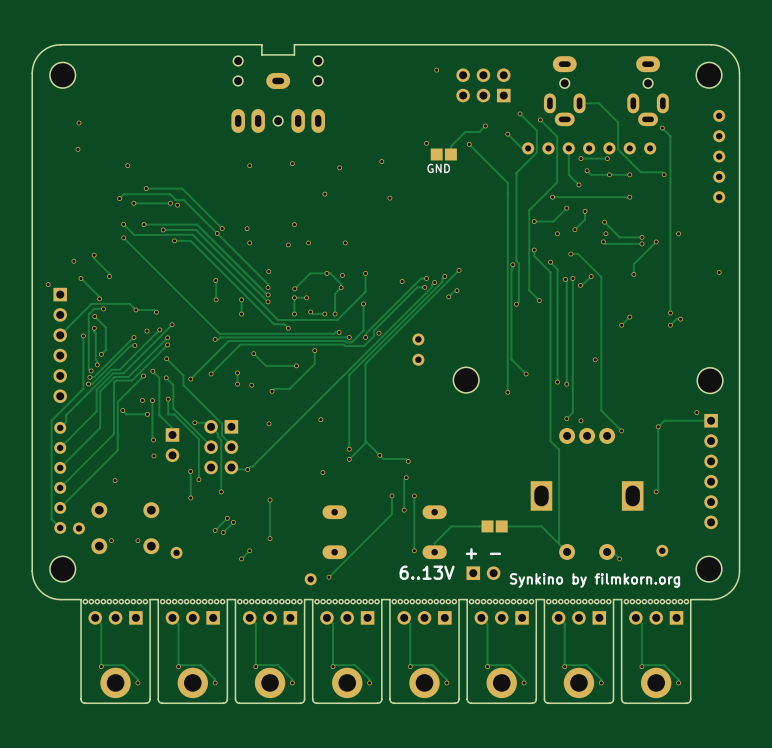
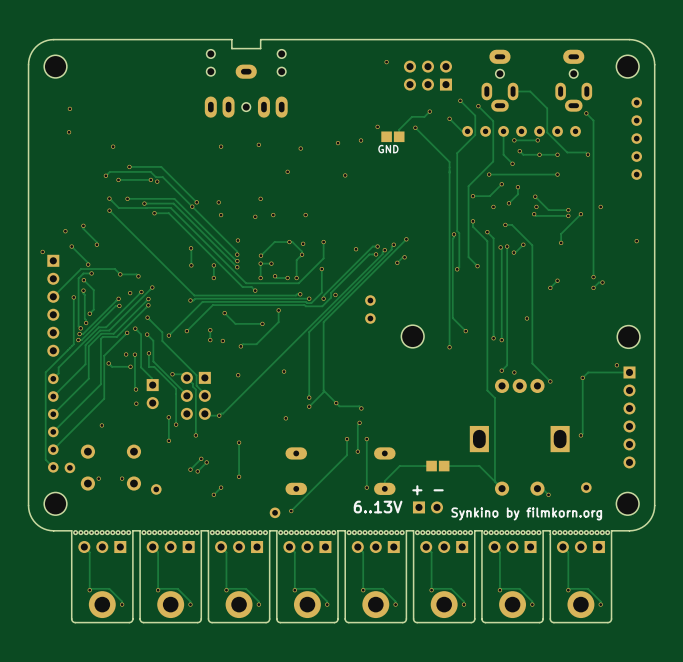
via: none -> (361, 140)

